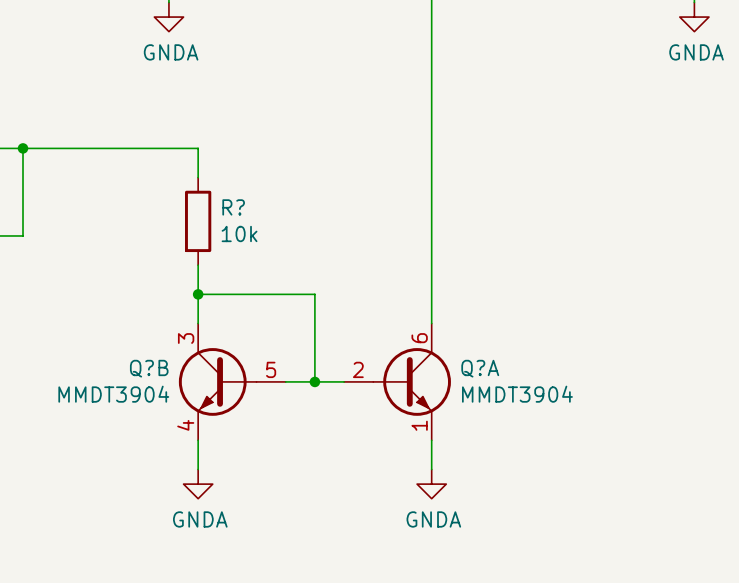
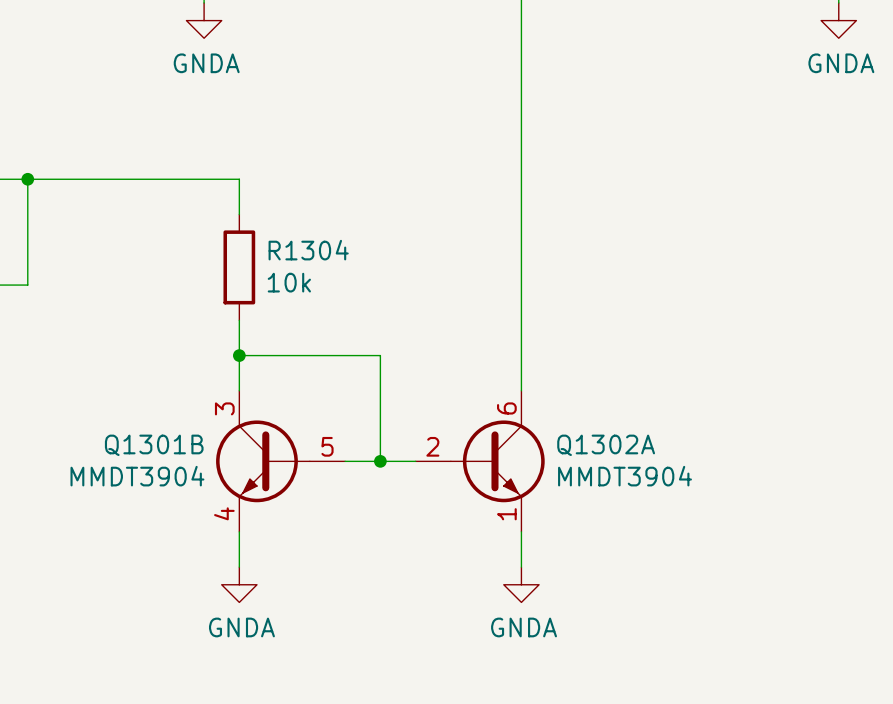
R? name: R? (233, 207) -> R1304 (308, 250)
Q?B name: Q?B (149, 368) -> Q1301B (154, 445)
Q?A name: Q?A (480, 368) -> Q1302A (606, 445)

